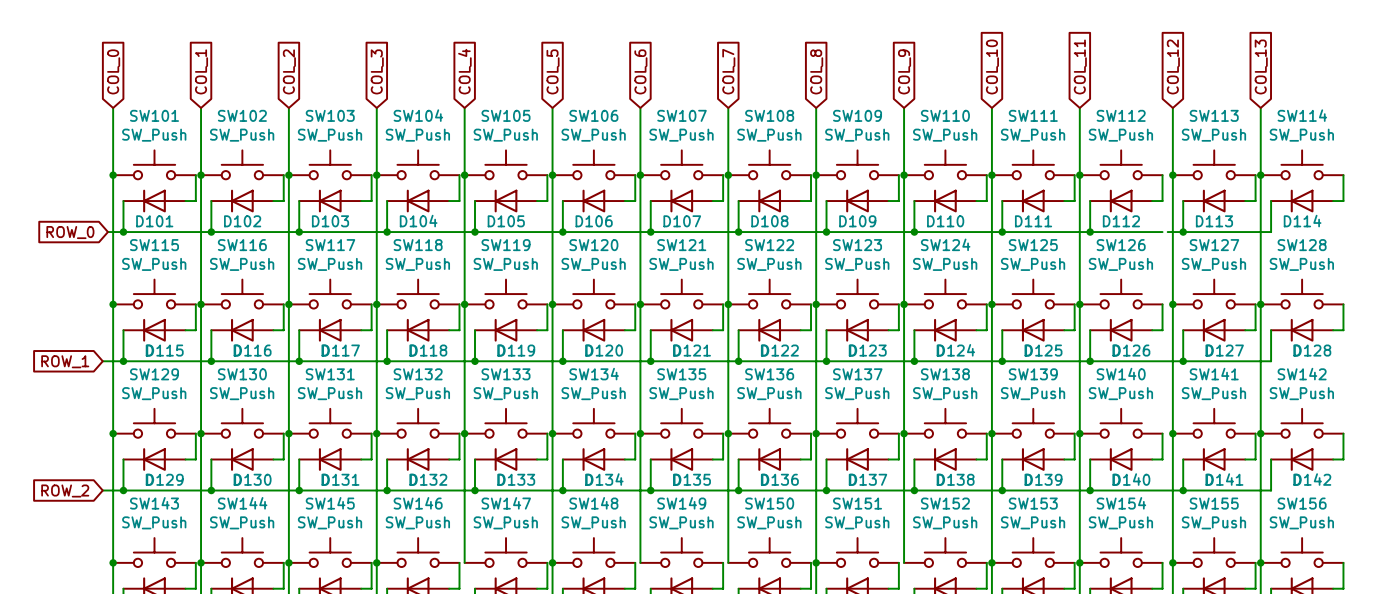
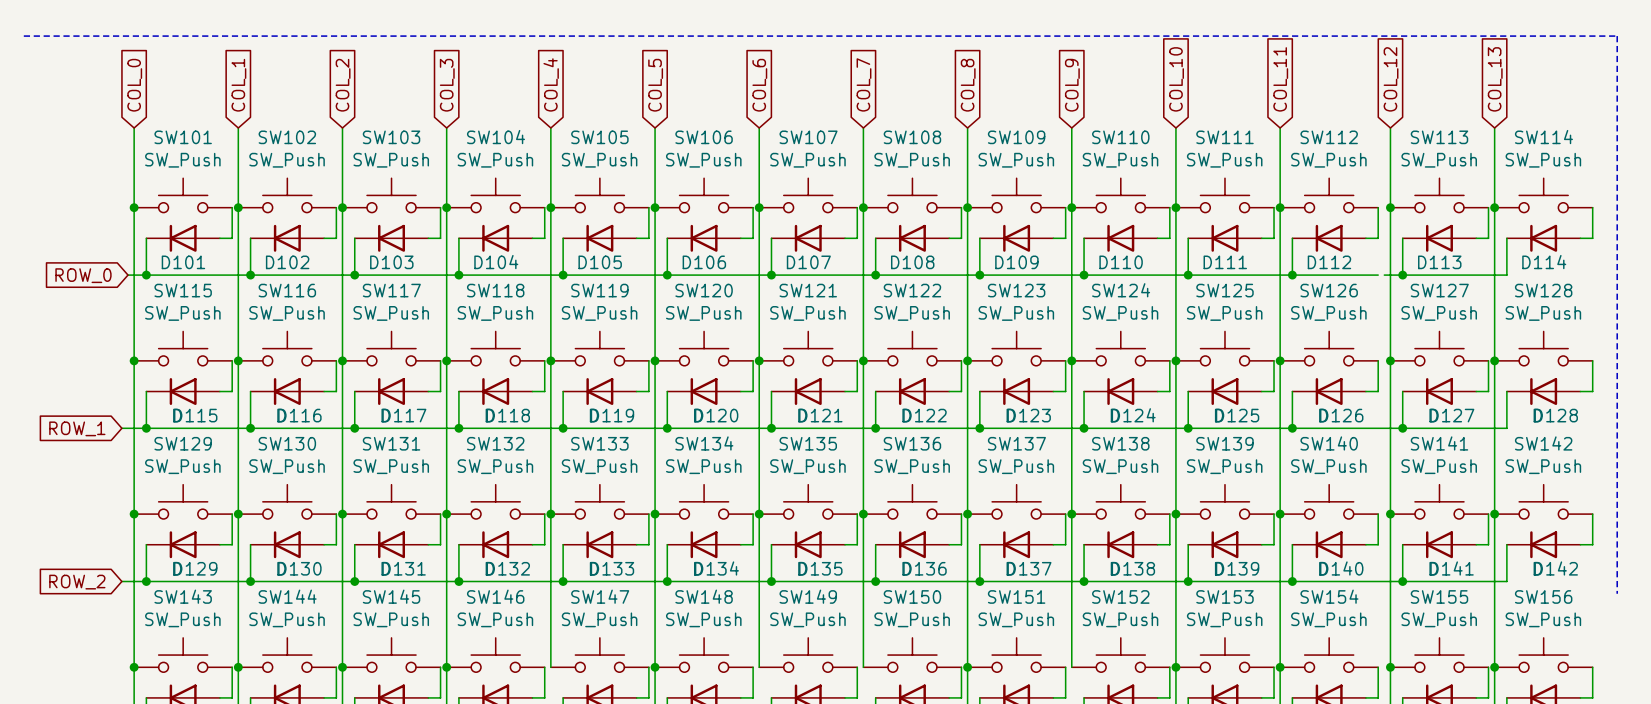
line: none -> (23, 36) (1617, 36) (1617, 593)

